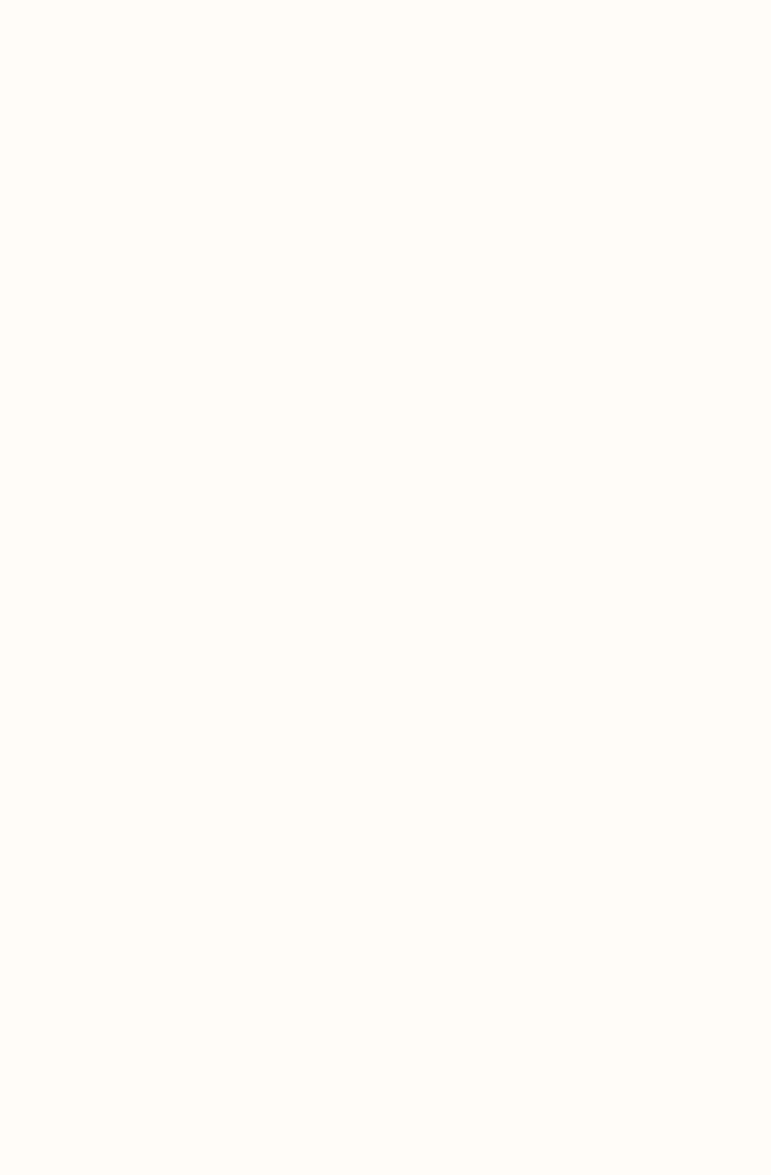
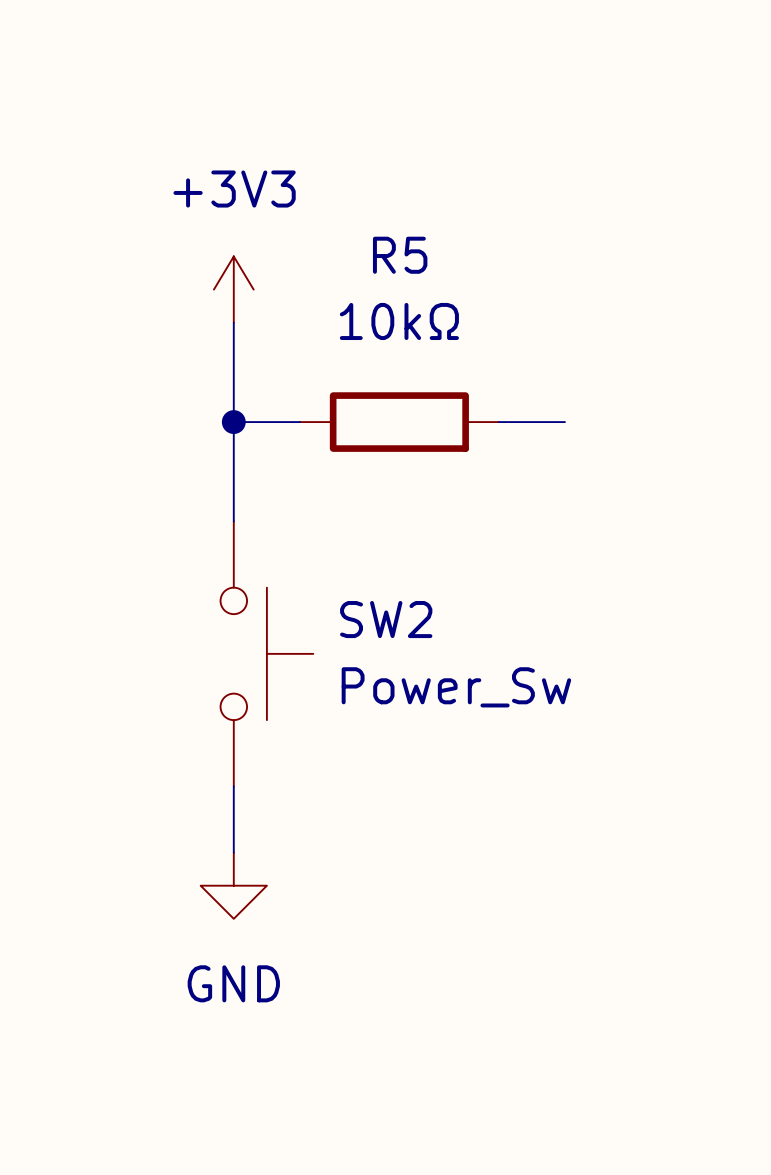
power symbol: none -> +3V3 (233, 289)
wire: none -> (233, 322) (233, 521)
wire: none -> (233, 422) (300, 422)
junction: none -> (233, 422)
R5: none -> 10kΩ (399, 422)
wire: none -> (498, 422) (564, 422)
SW2: none -> Power_Sw (266, 653)
wire: none -> (233, 786) (233, 852)
power symbol: none -> GND (233, 885)

